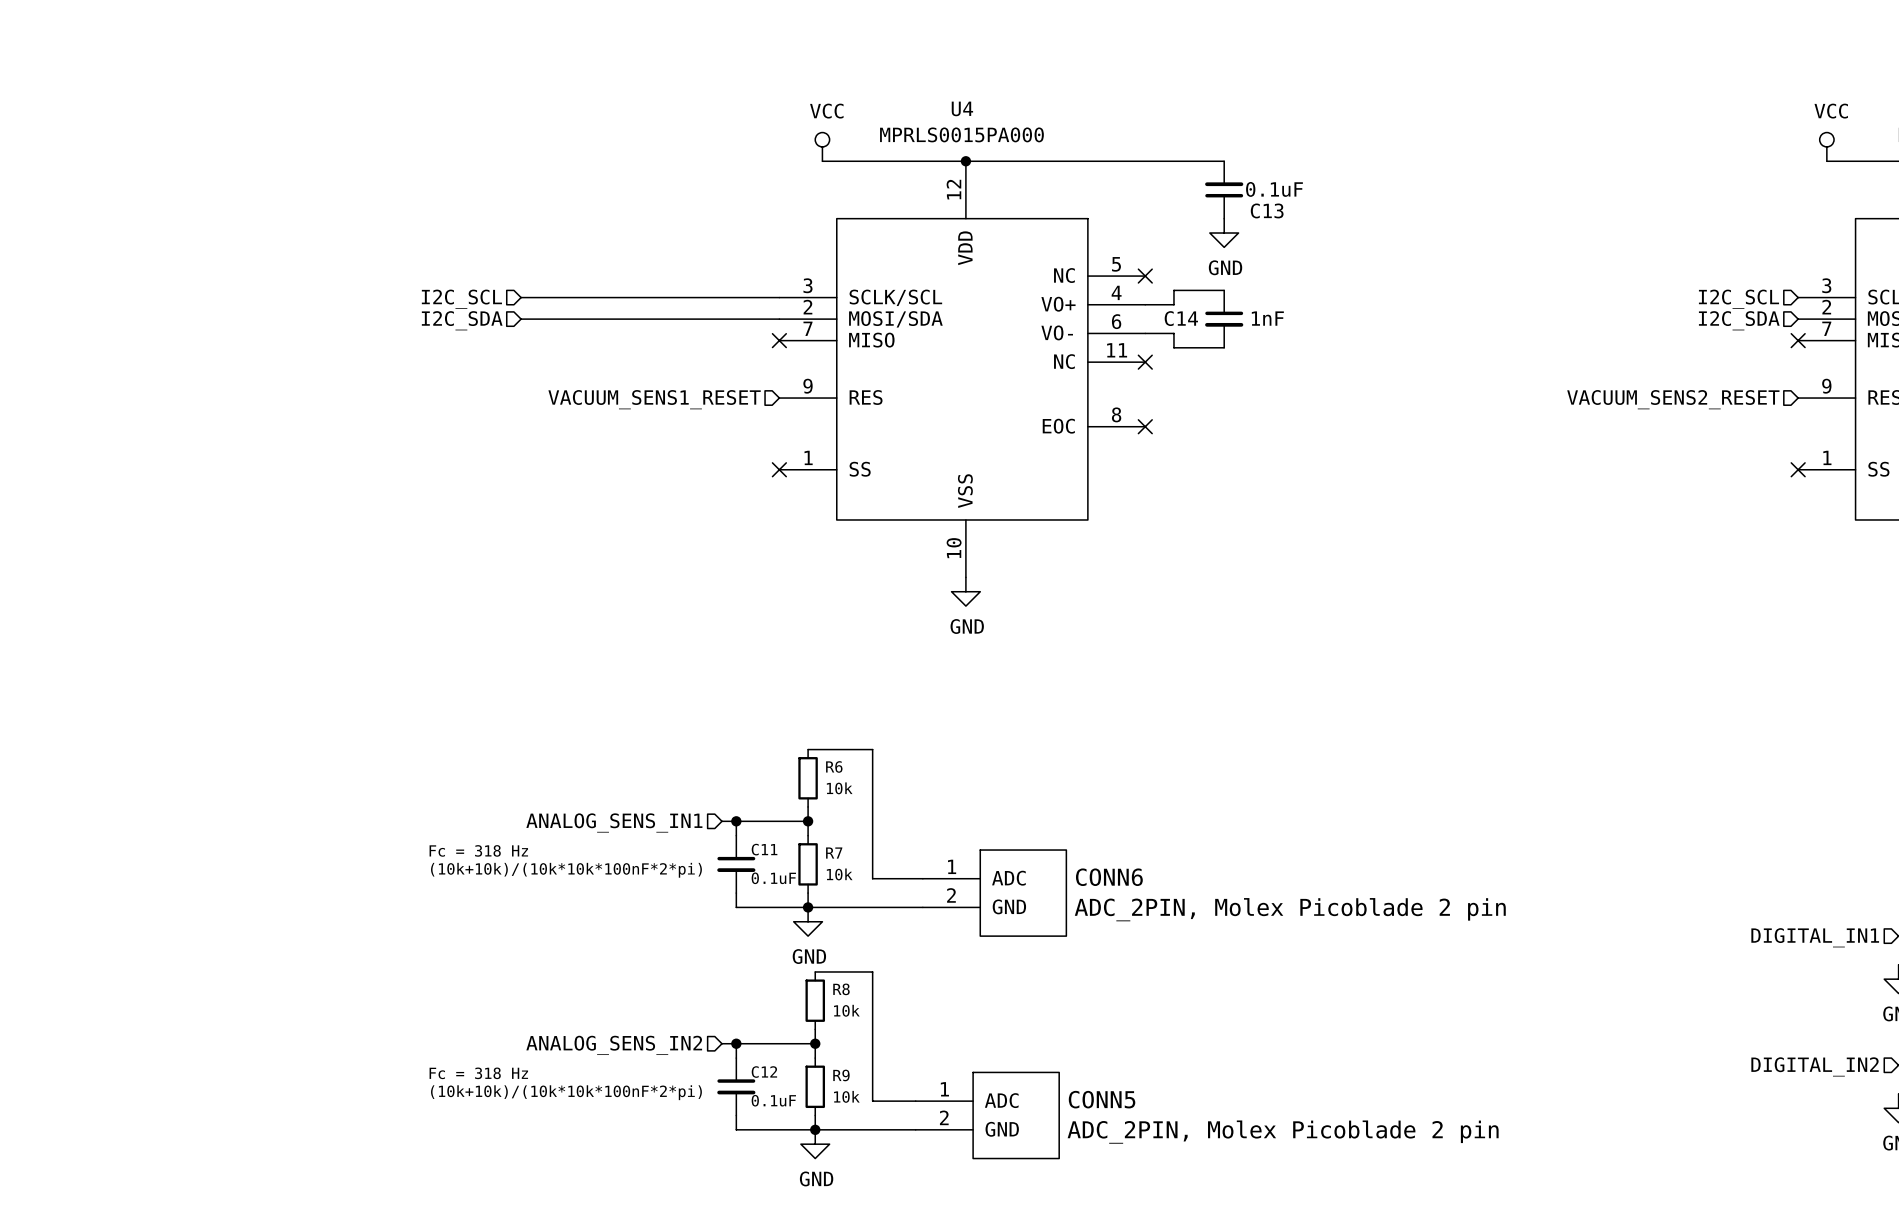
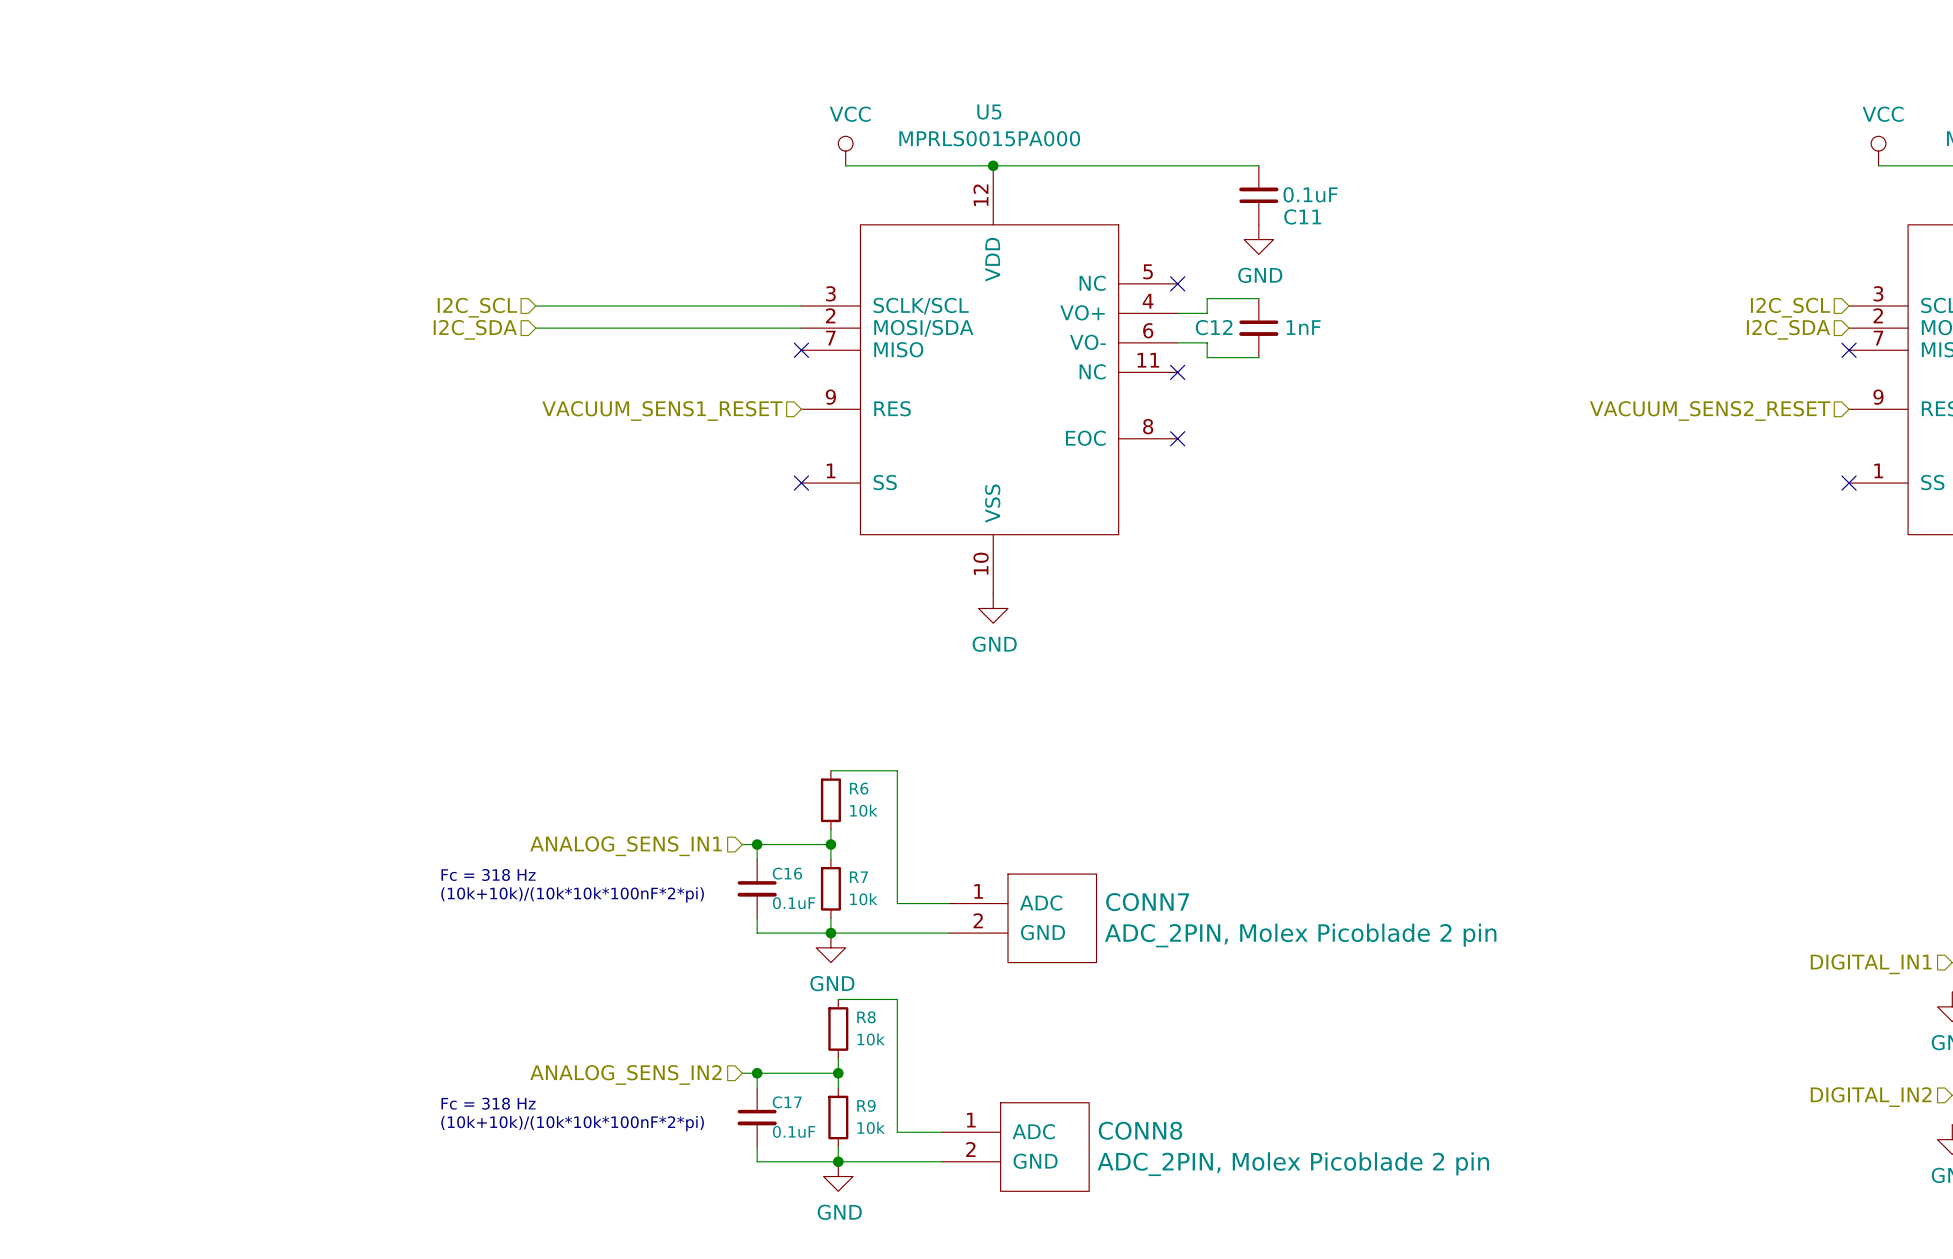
U4 name: U4 (962, 108) -> U5 (989, 112)
C13 name: C13 (1267, 210) -> C11 (1302, 216)
C14 name: C14 (1181, 318) -> C12 (1214, 327)
C11 name: C11 (764, 849) -> C16 (787, 873)
CONN6 name: CONN6 (1109, 877) -> CONN7 (1147, 902)
C12 name: C12 (764, 1072) -> C17 (787, 1102)
CONN5 name: CONN5 (1102, 1099) -> CONN8 (1140, 1130)

